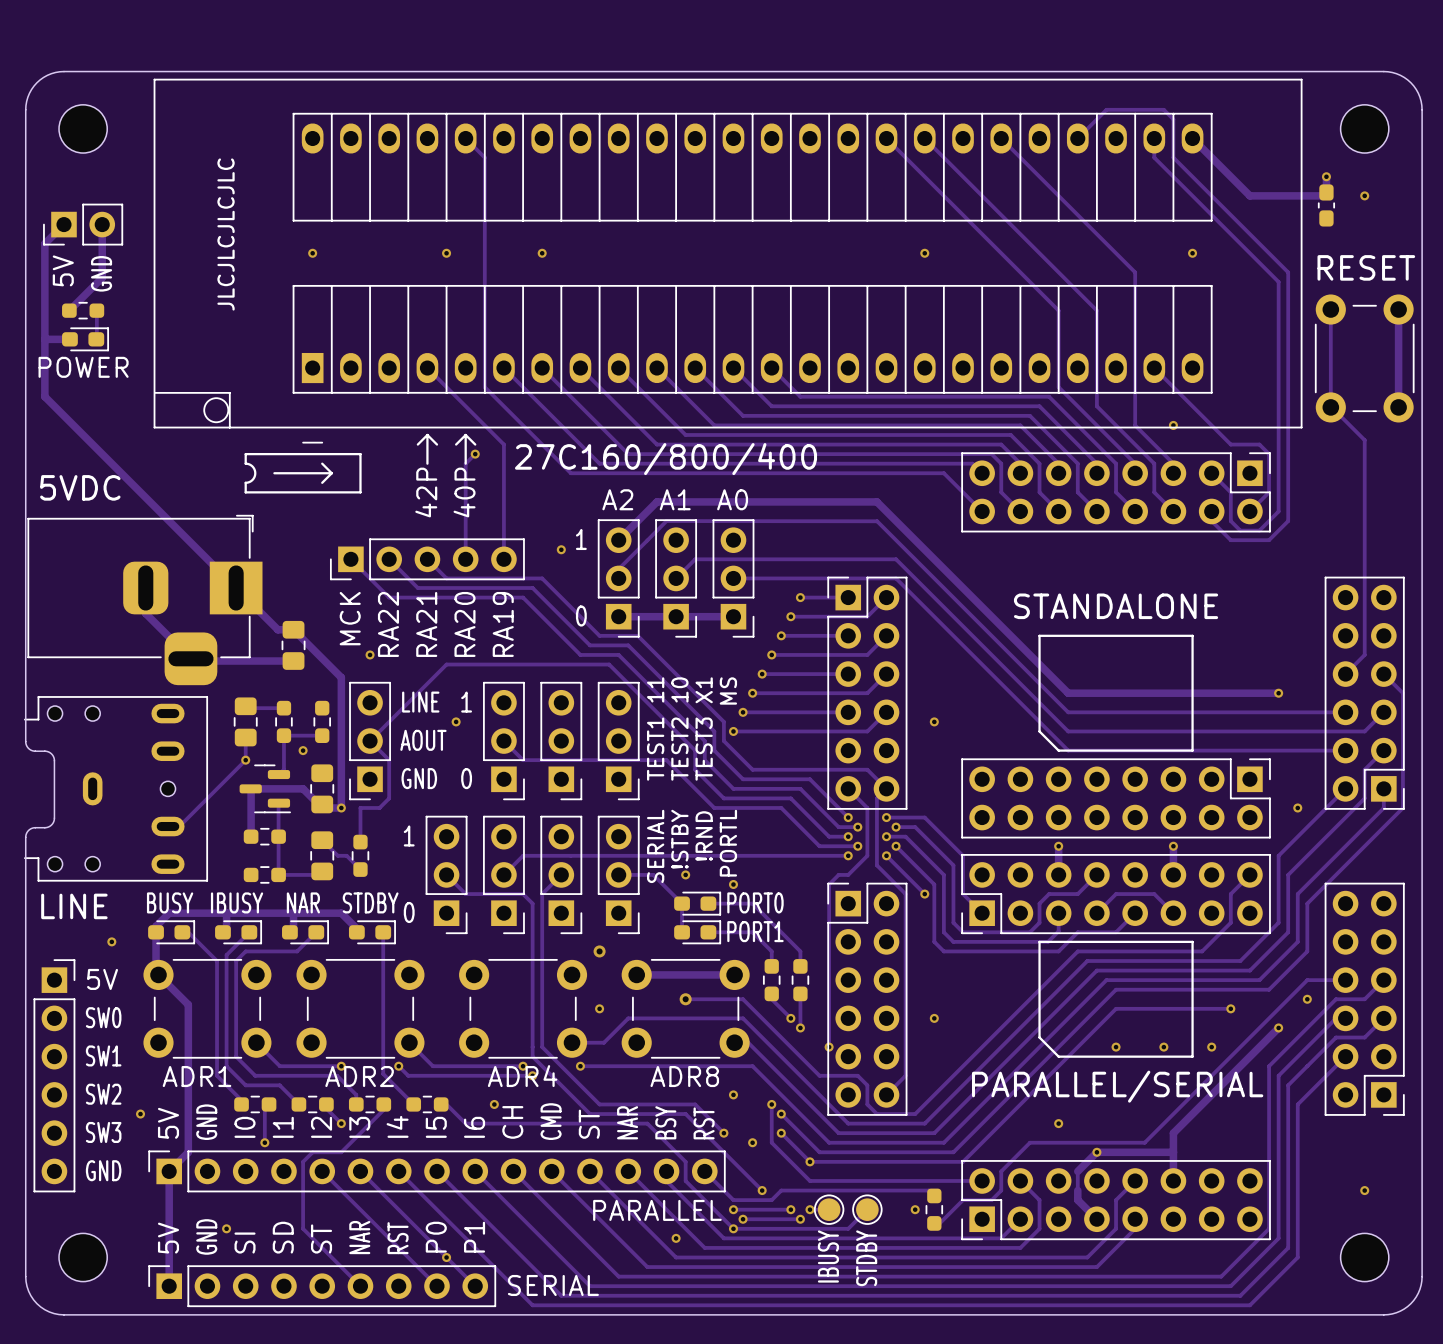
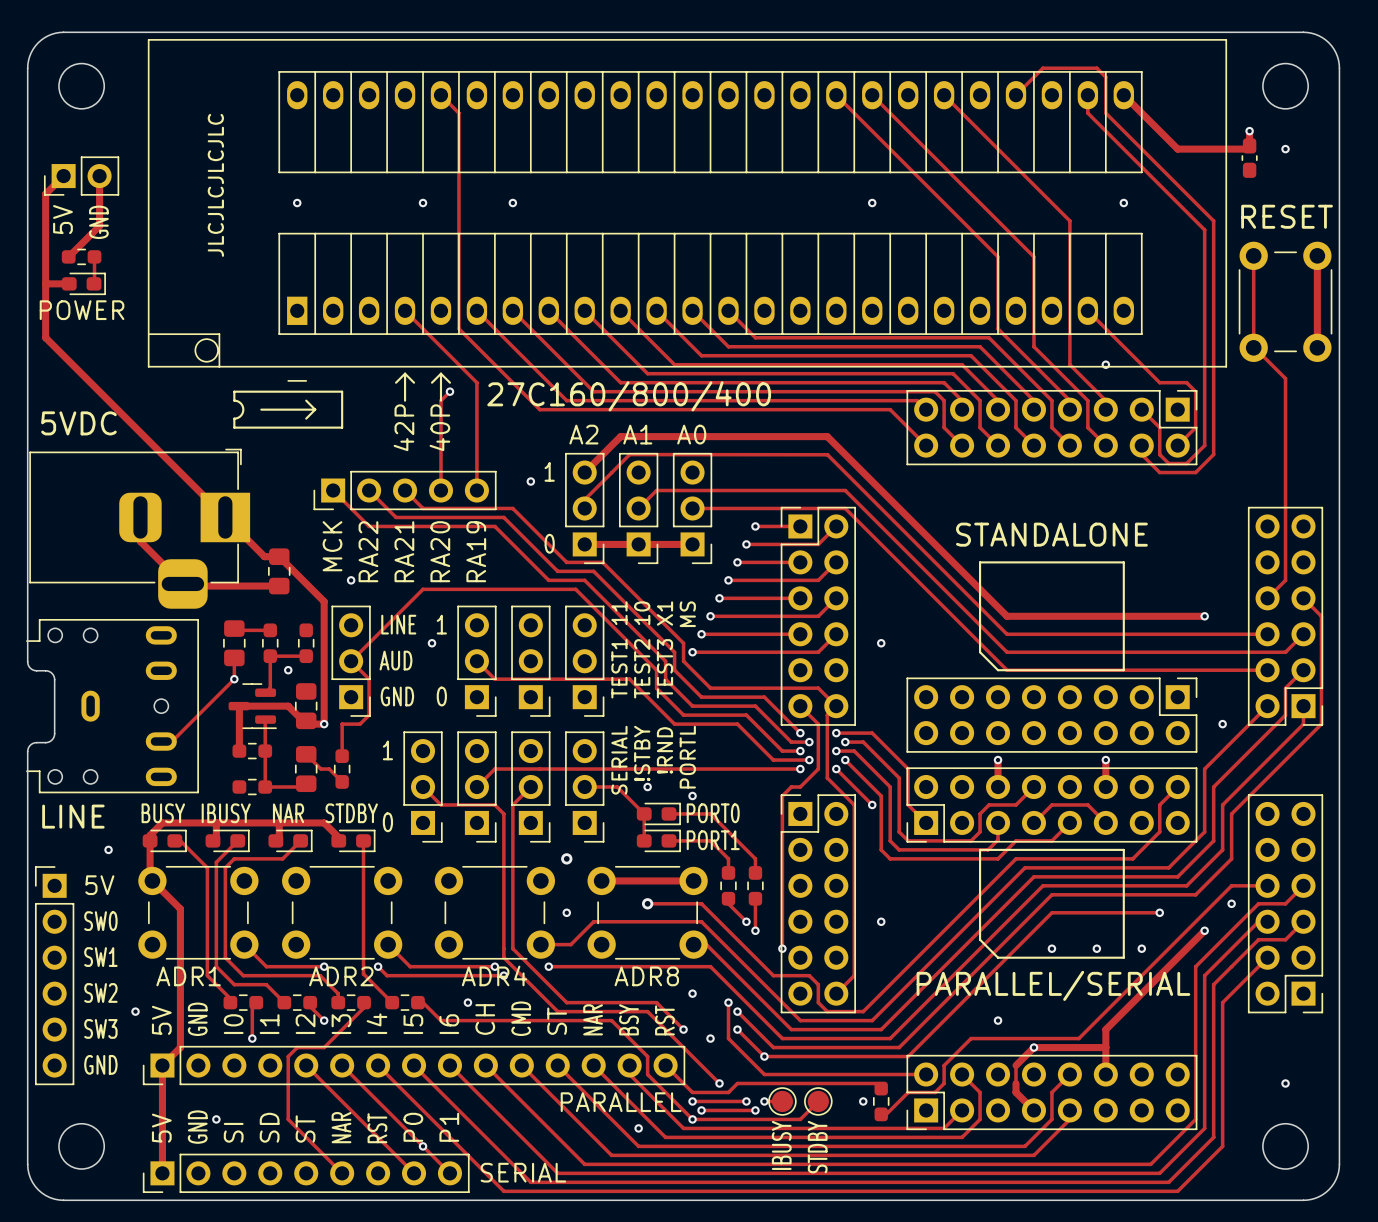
part footprint: [349, 681, 391, 801] -> [331, 605, 371, 717]
text: AOUT (423, 740) -> AUD (395, 660)
part footprint: [33, 959, 76, 1193] -> [34, 866, 75, 1086]
part footprint: [148, 1150, 726, 1193] -> [142, 1045, 686, 1086]
part footprint: [148, 1265, 497, 1308] -> [142, 1153, 470, 1194]

